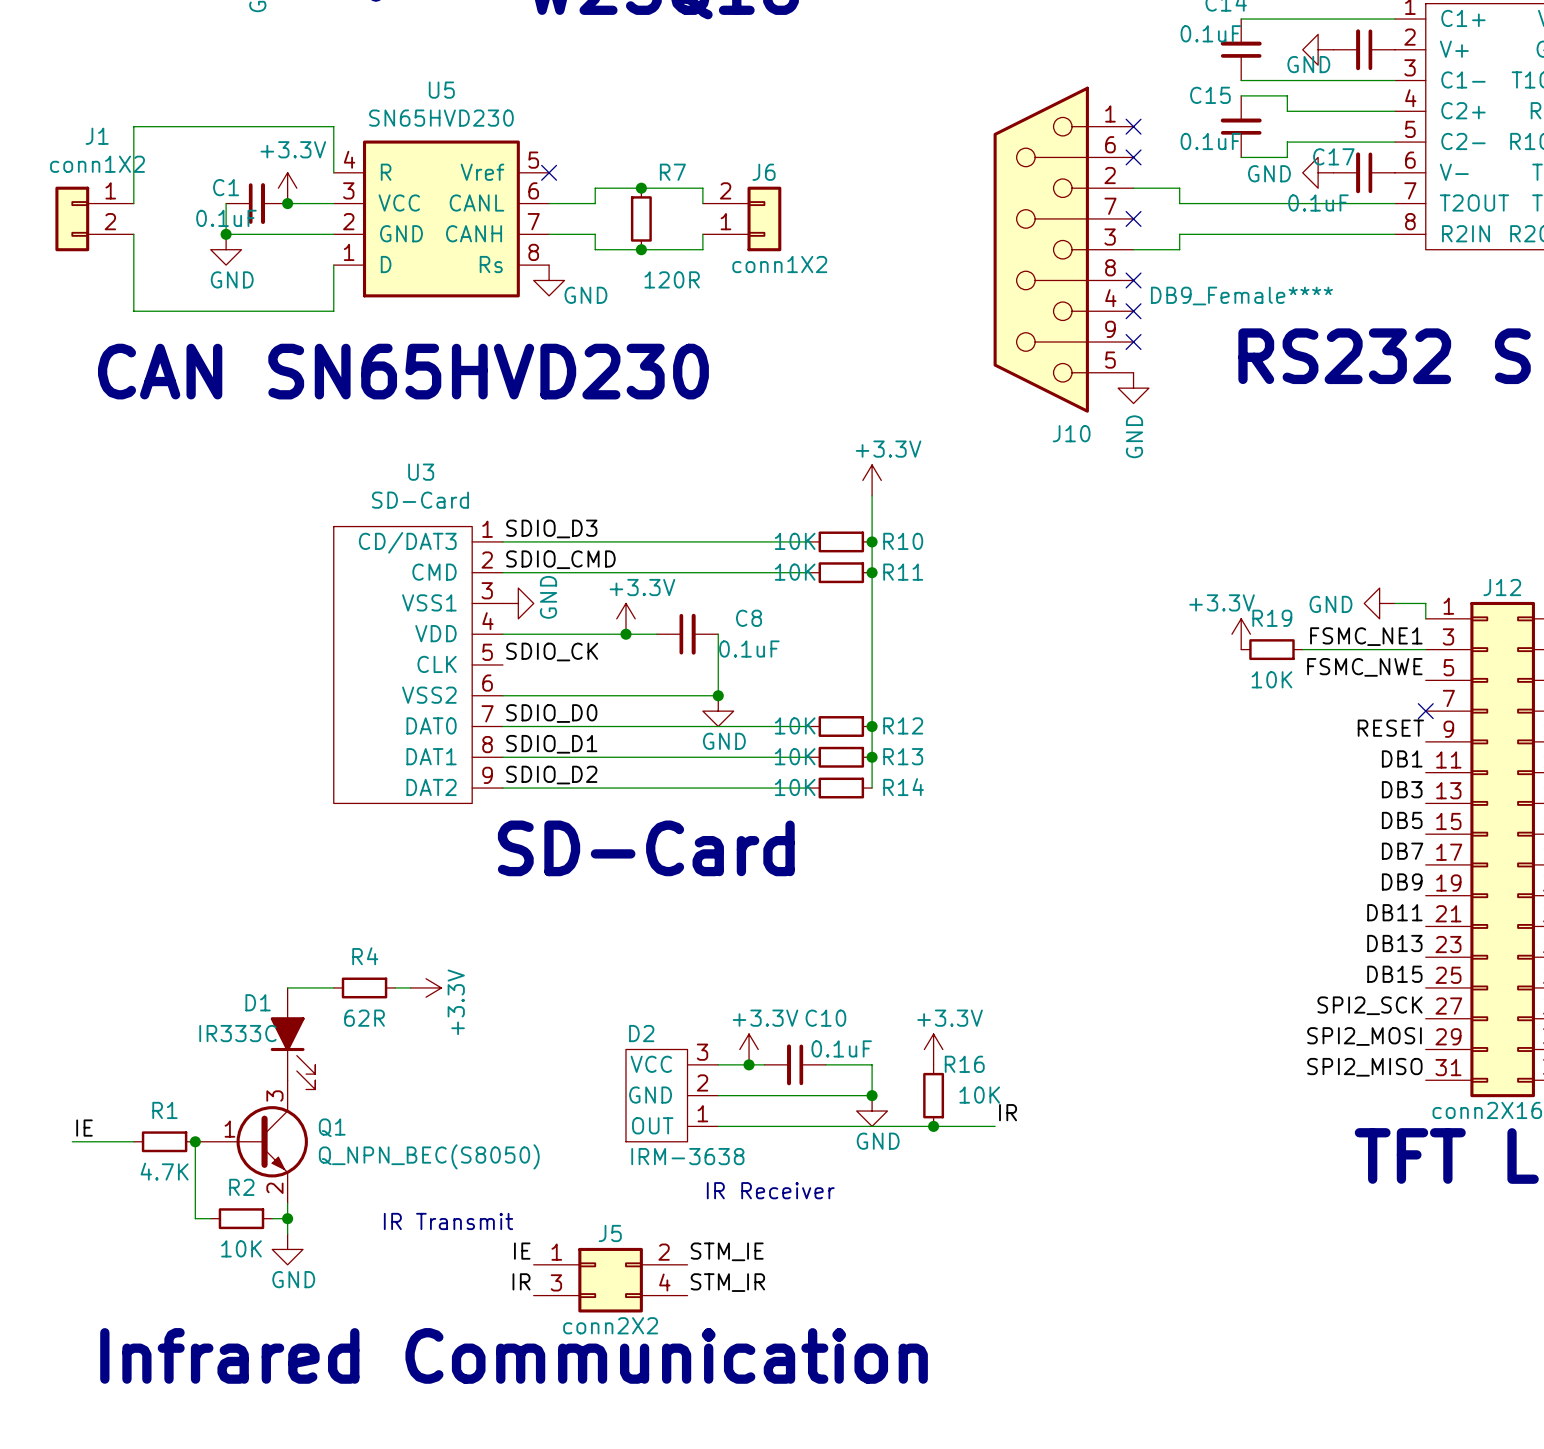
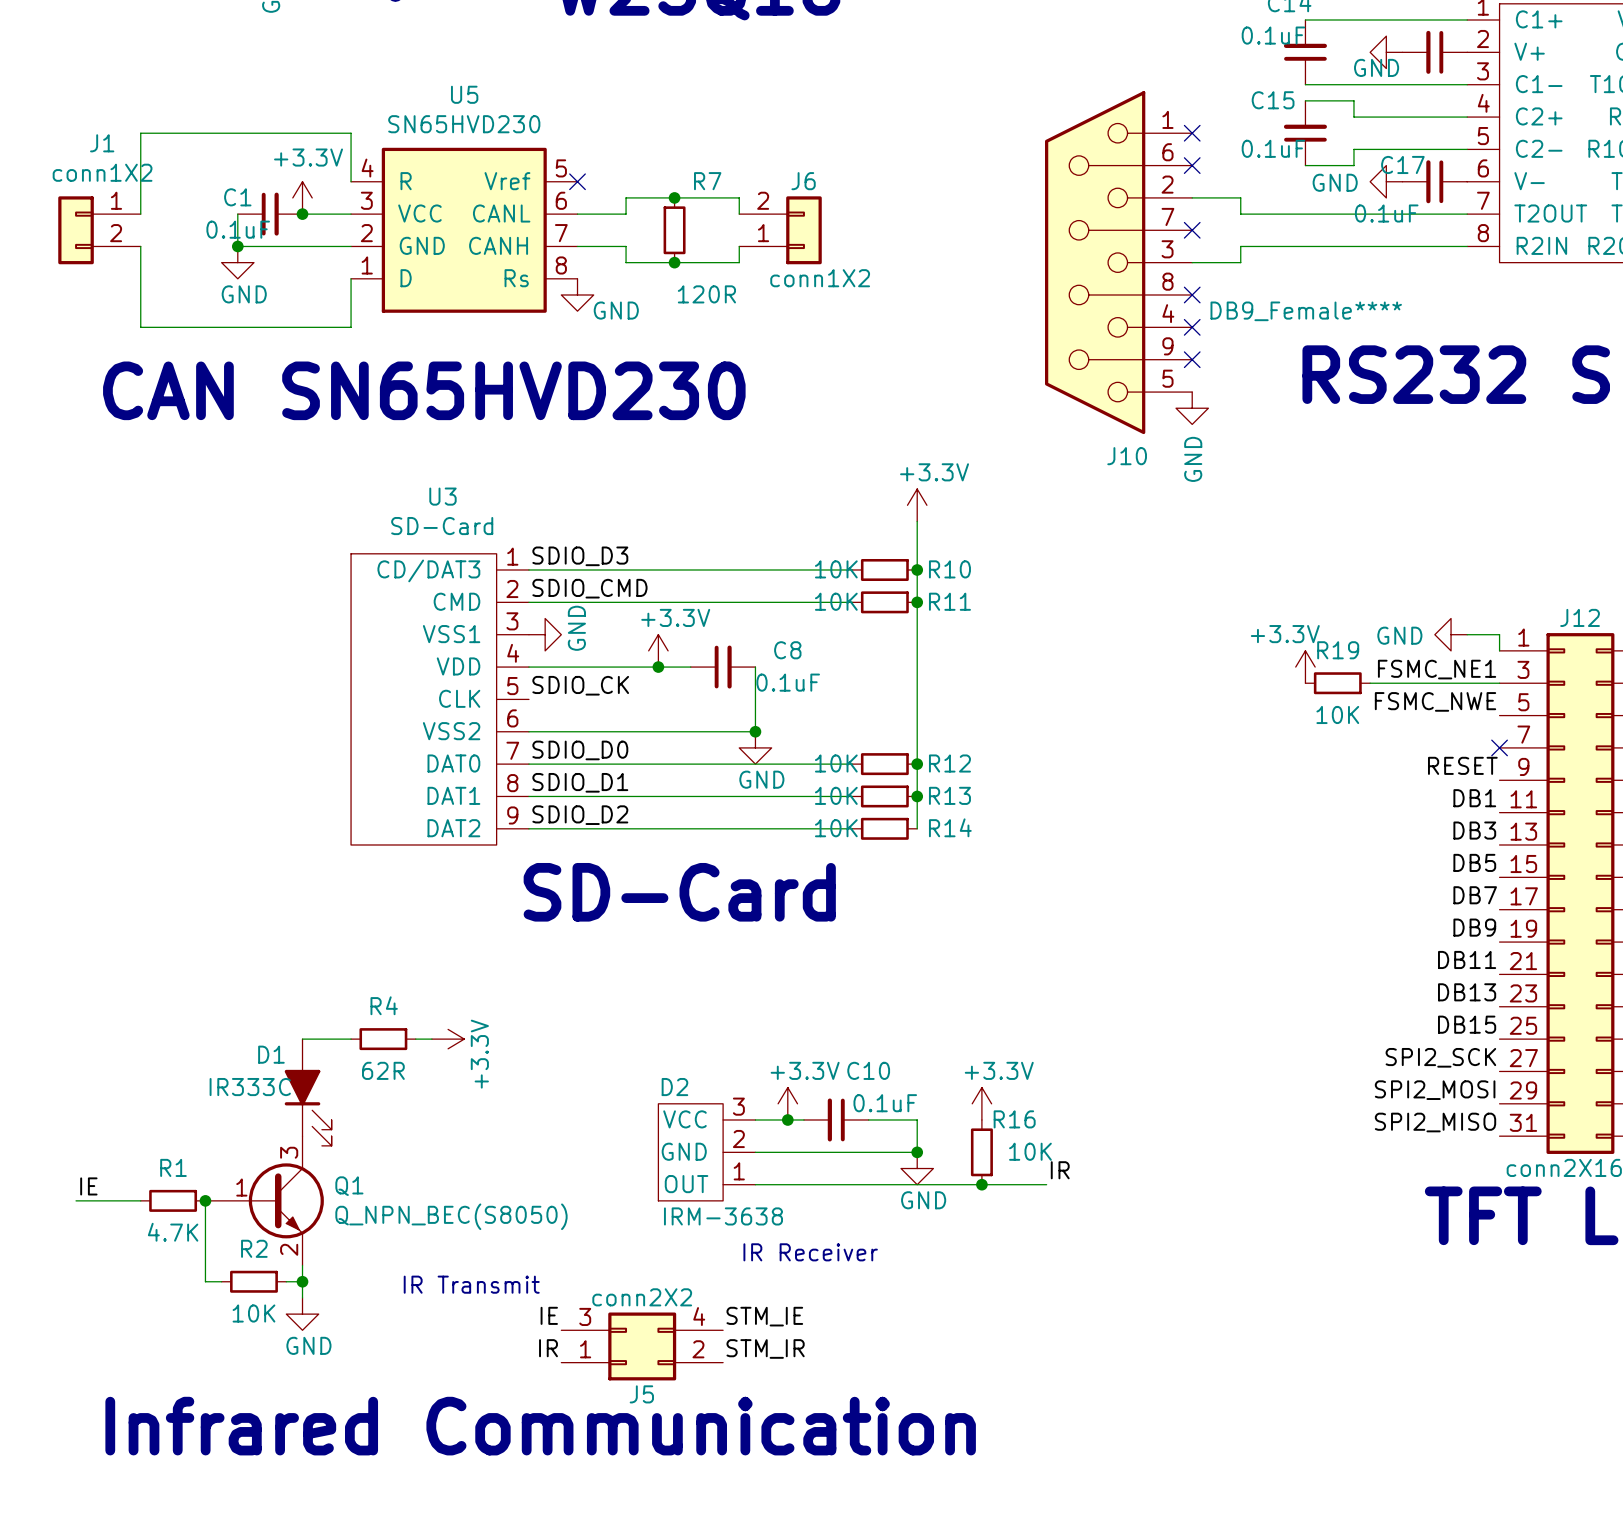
J5 flip: as is (610, 1280) -> up-down (642, 1346)

